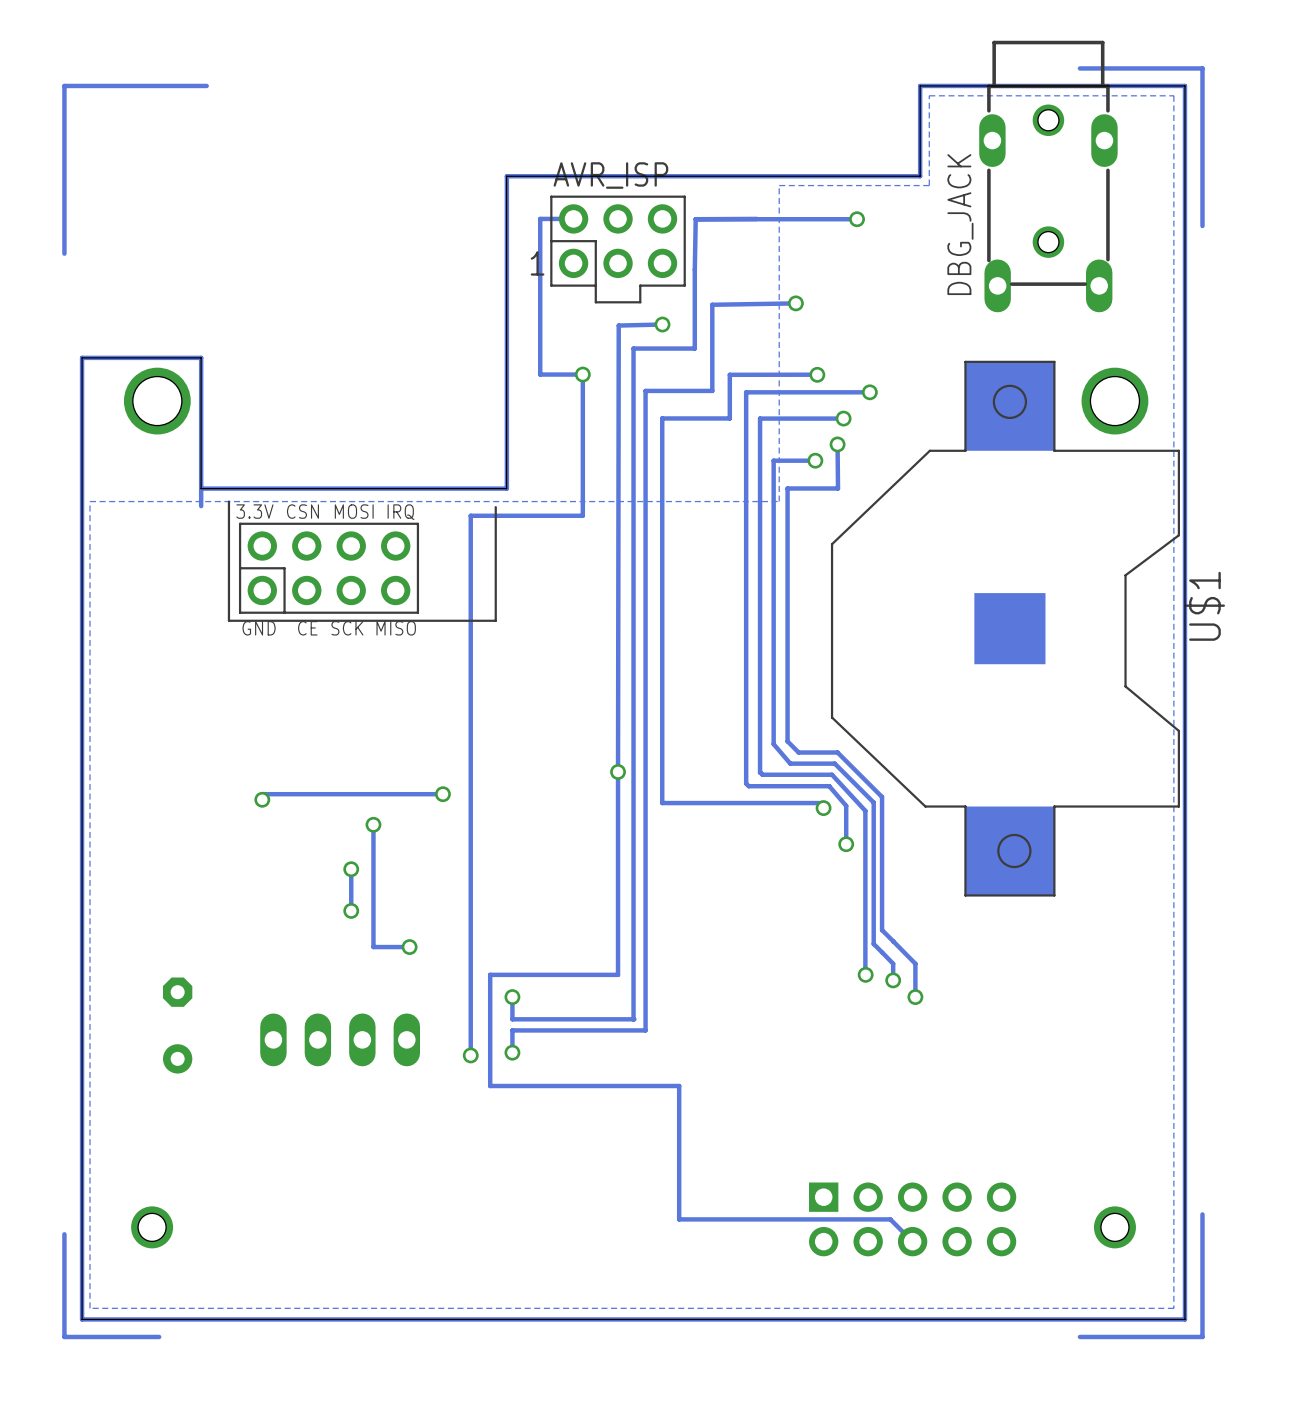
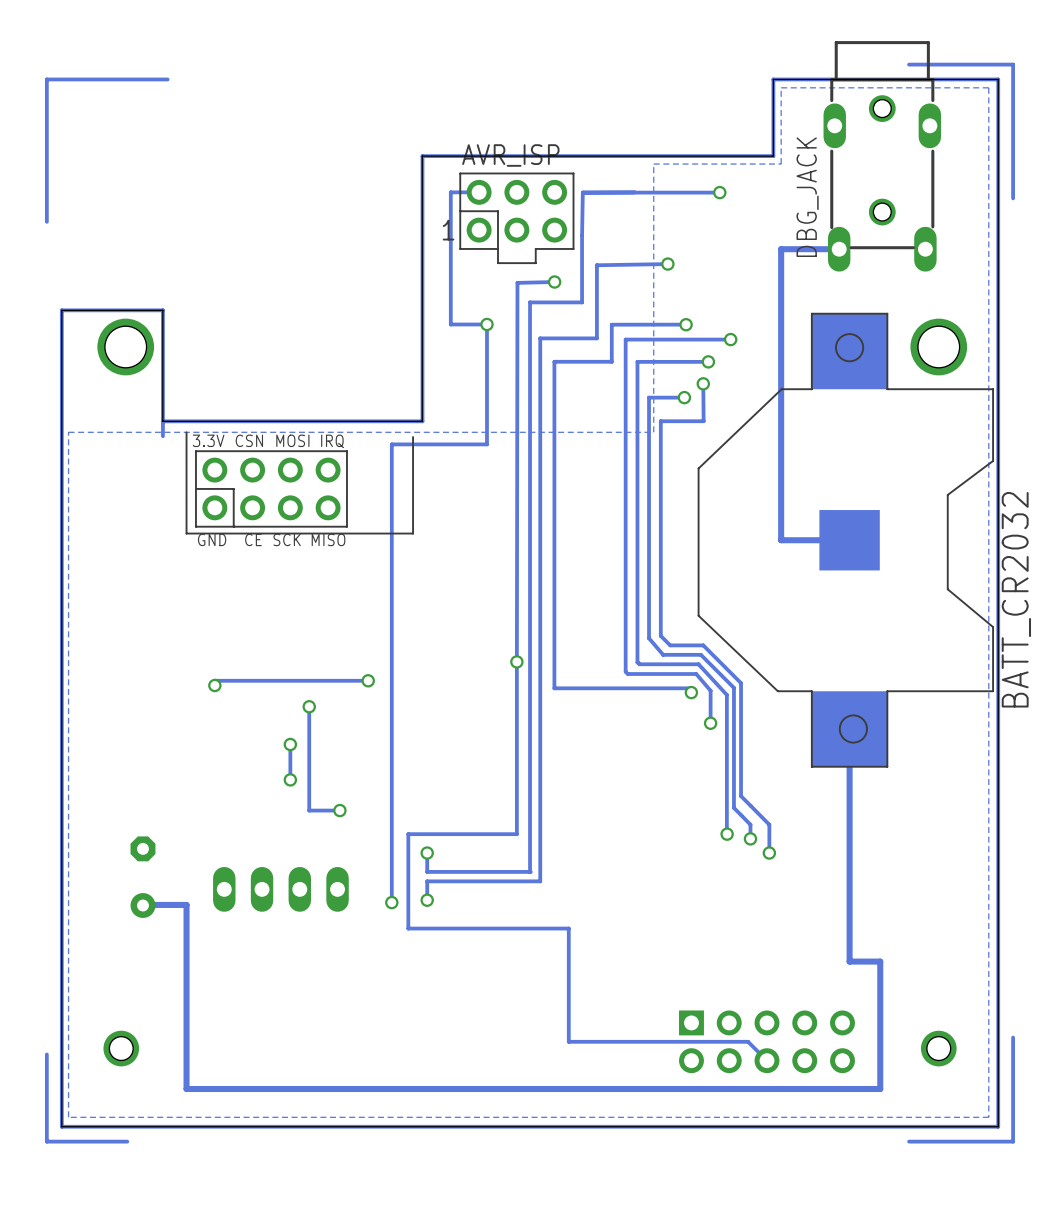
track: none -> (839, 249) (781, 249) (781, 540) (849, 540)
U$1 name: U$1 (1204, 606) -> BATT_CR2032 (1016, 599)
track: none -> (849, 729) (849, 961) (880, 961) (880, 1088) (186, 1088) (186, 904) (142, 905)

